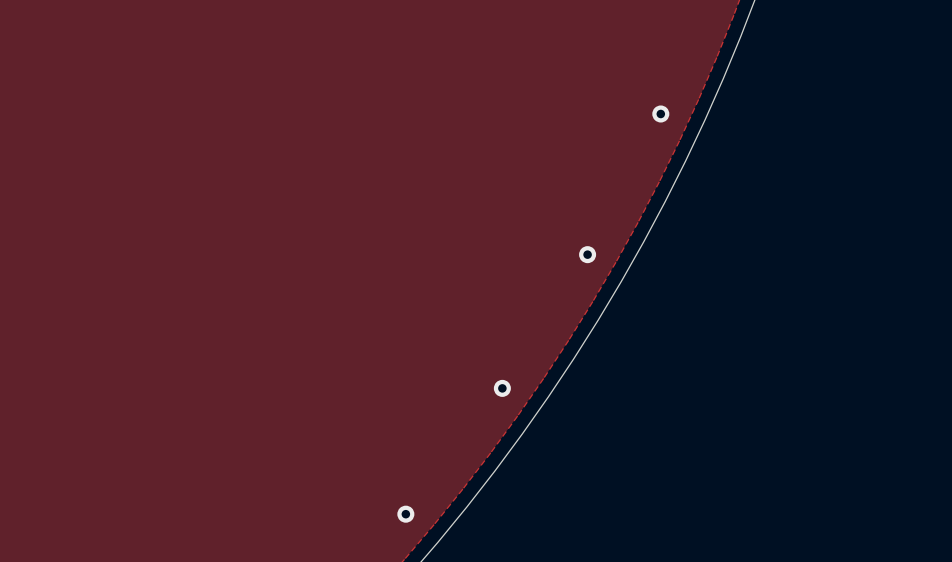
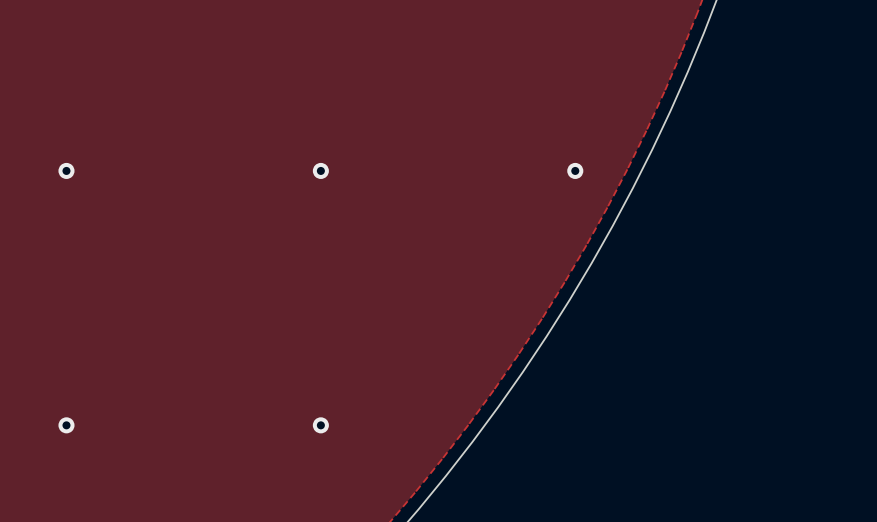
via: (660, 113) -> none
via: none -> (66, 170)
via: none -> (320, 170)
via: none -> (575, 170)
via: (587, 254) -> none
via: (502, 388) -> none
via: none -> (66, 425)
via: none -> (320, 425)
via: (405, 514) -> none

